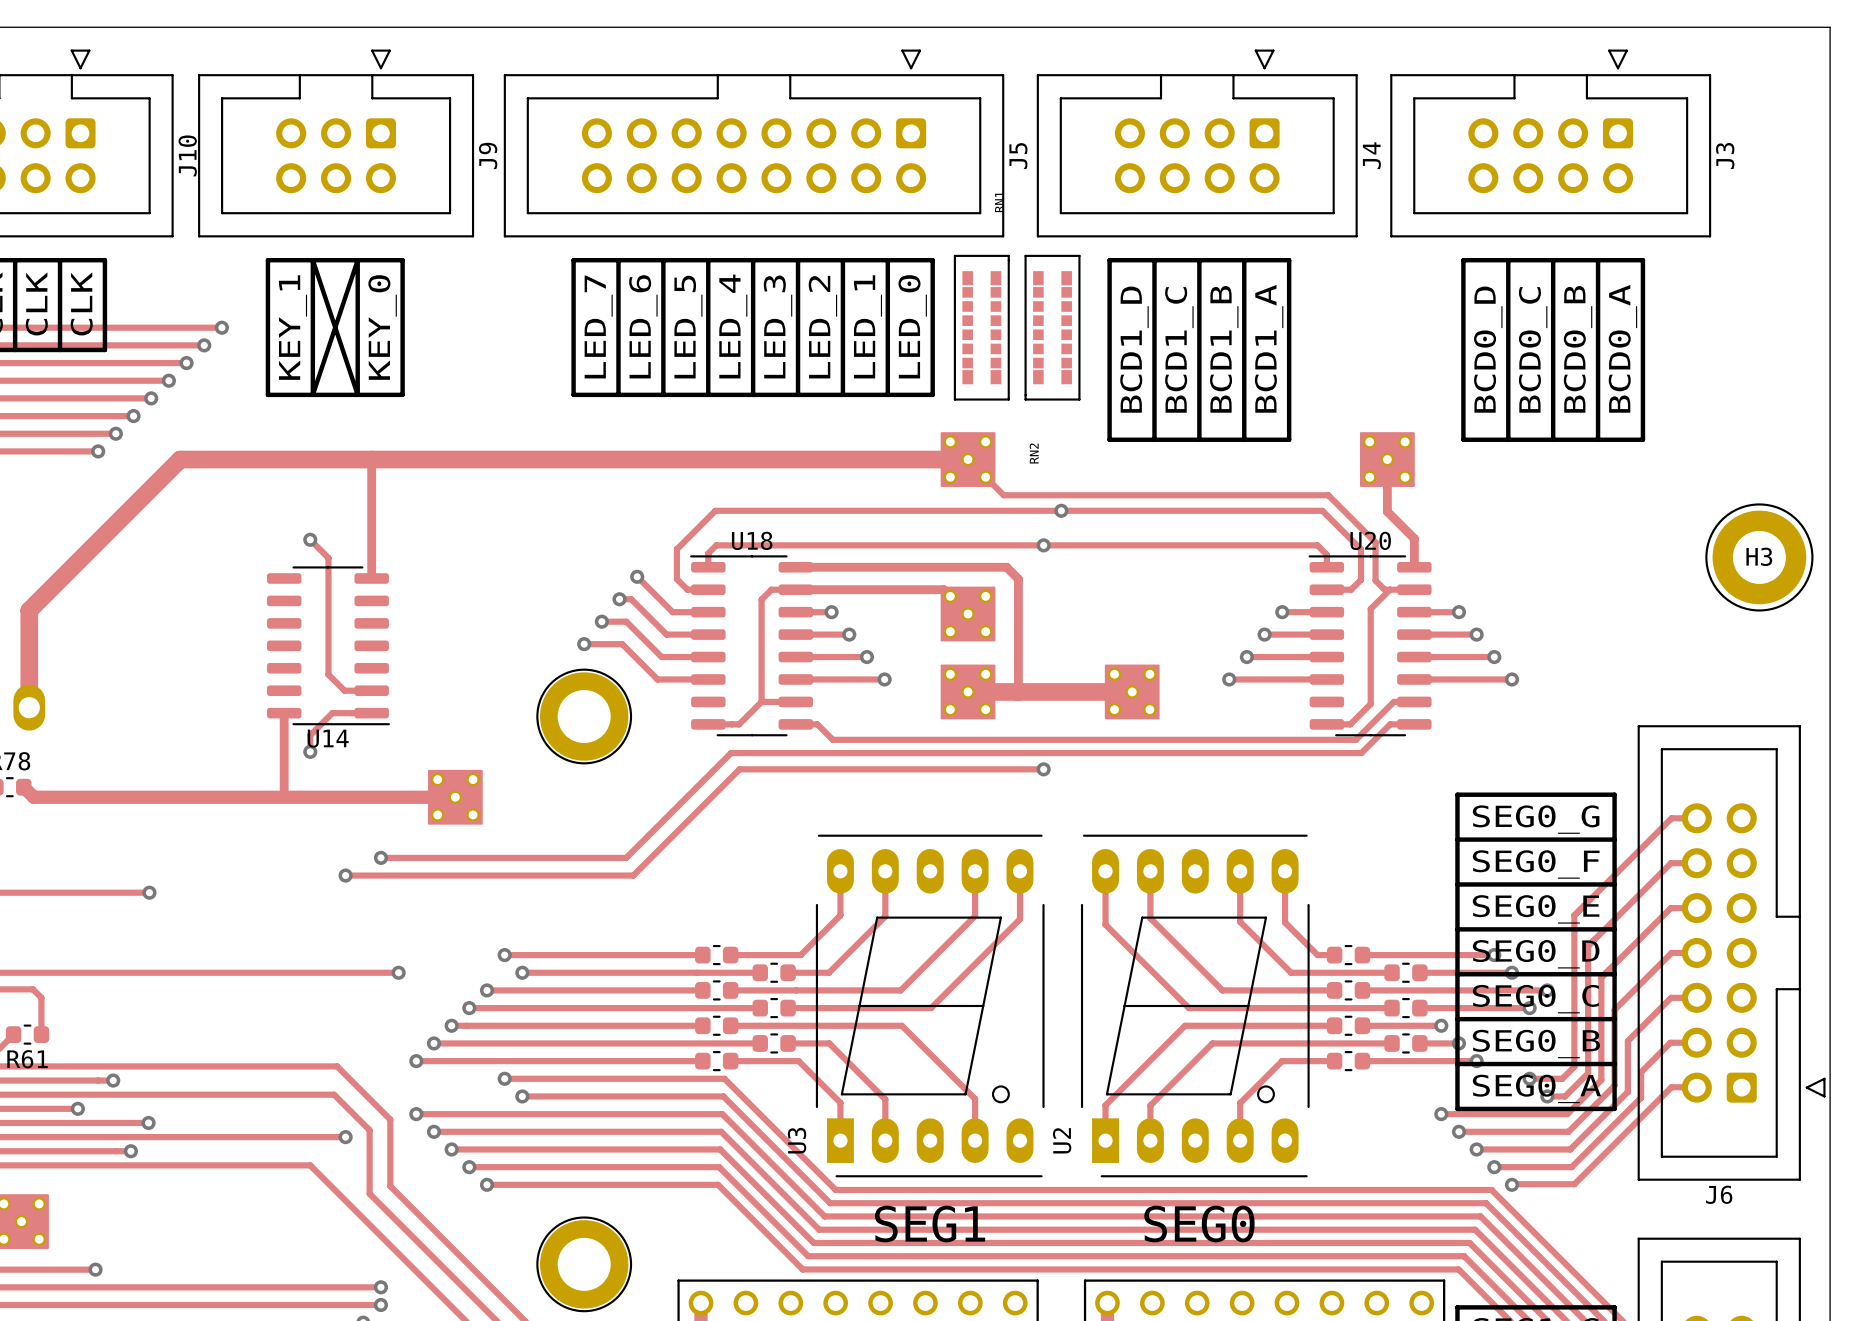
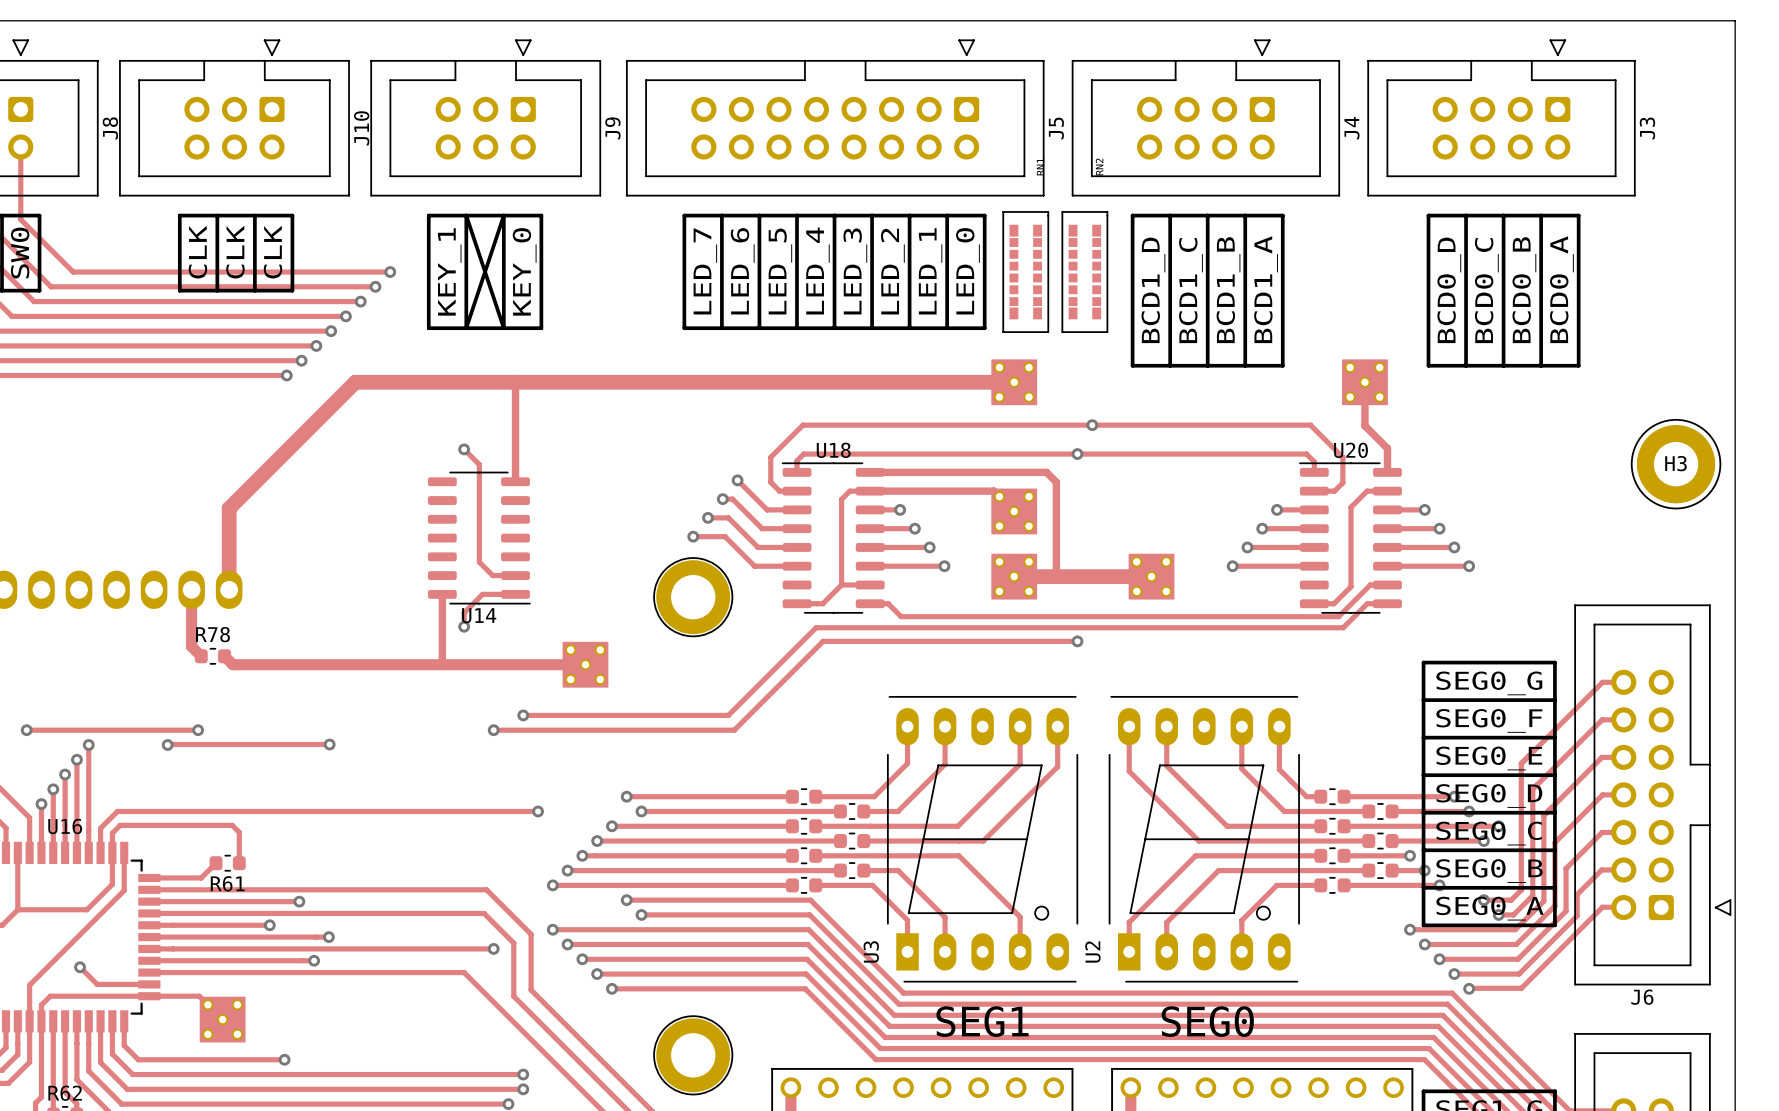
RN2 rotation: 0° (1052, 327) -> 180° (1084, 272)
track: (985, 477) (1003, 495) (1328, 495) (1375, 542) (1375, 580) (1384, 589) (1390, 589) -> none

